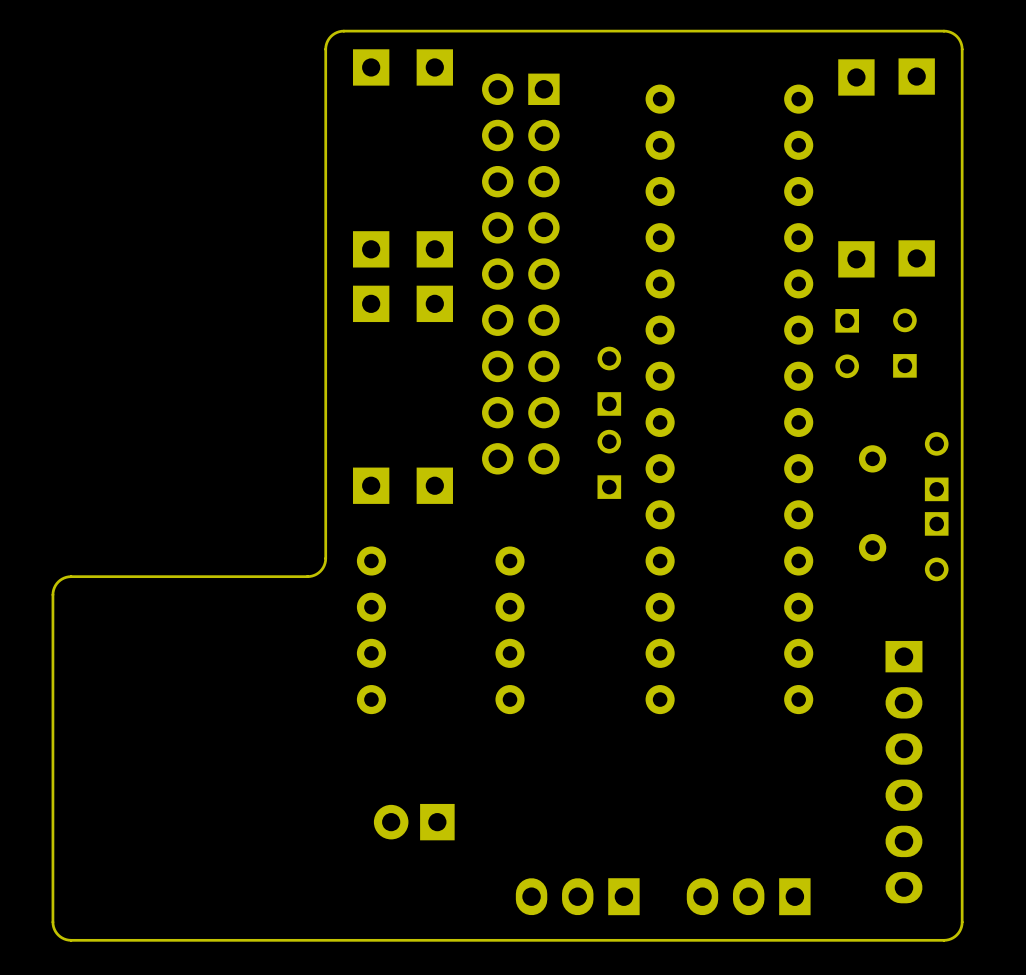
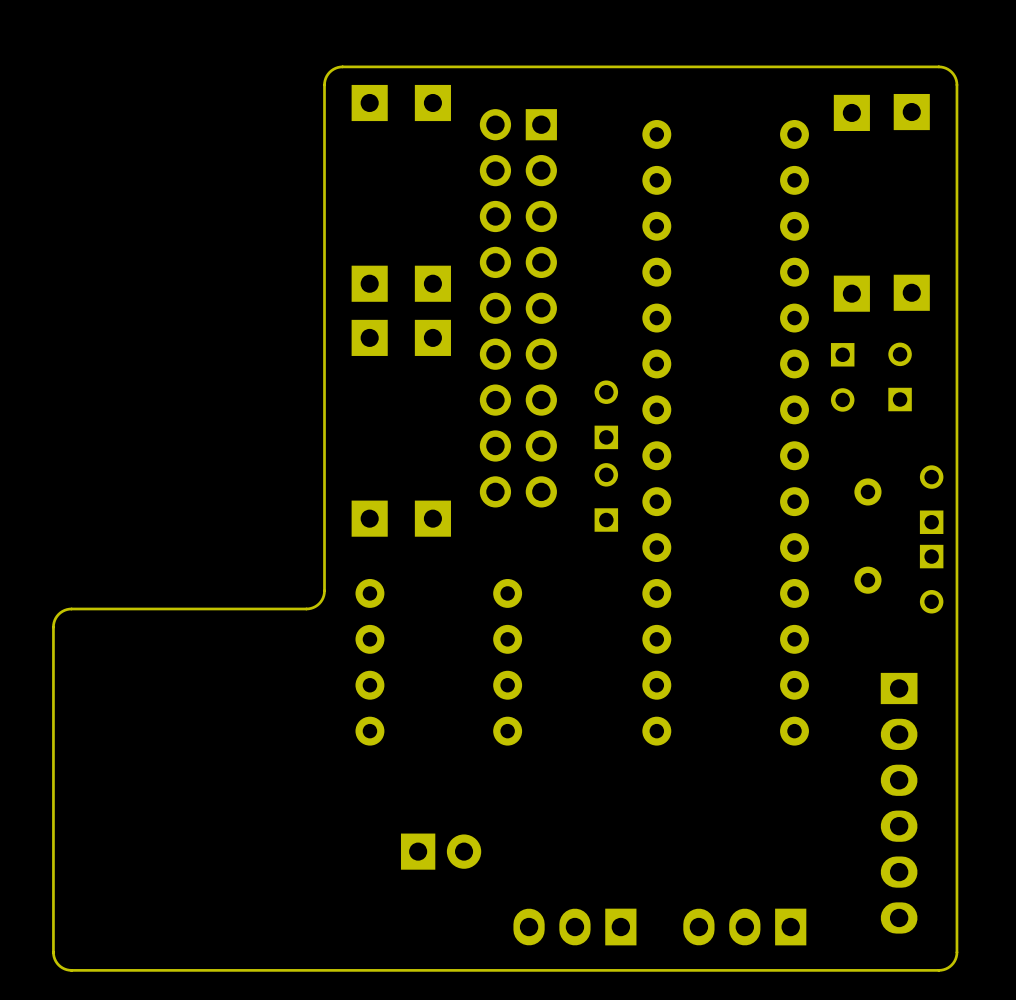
part rotation: 0° (414, 822) -> 180° (441, 851)

